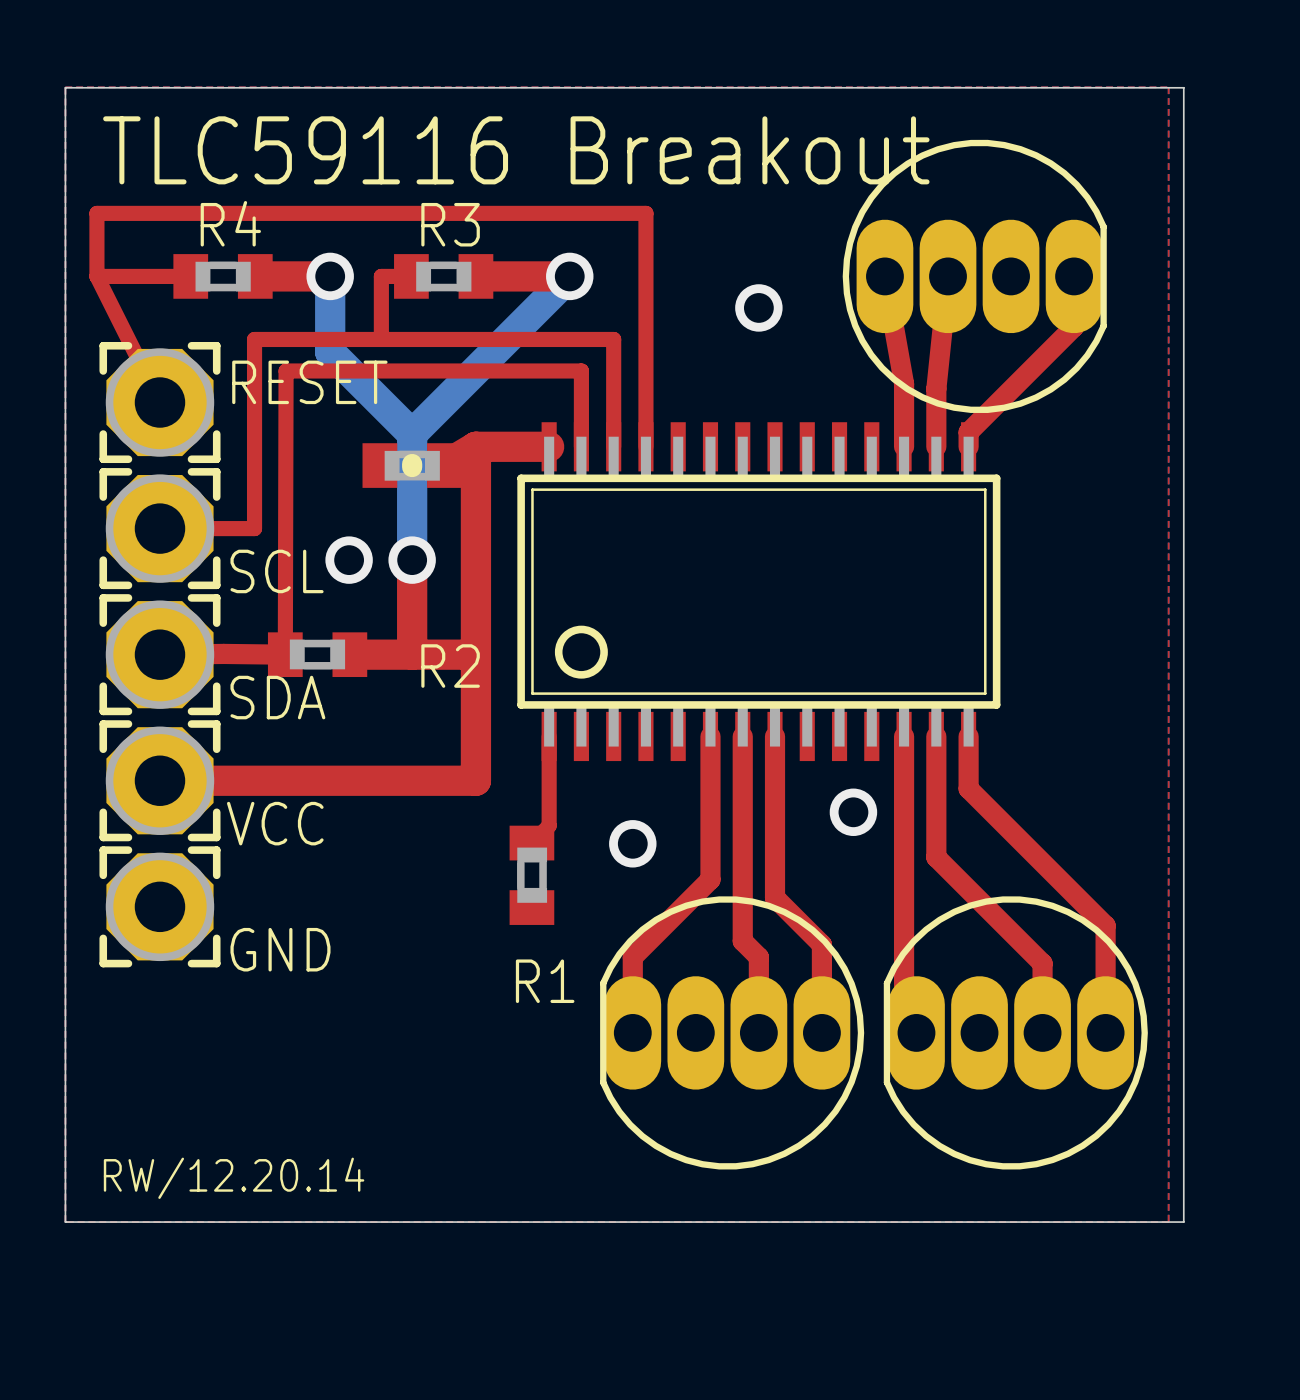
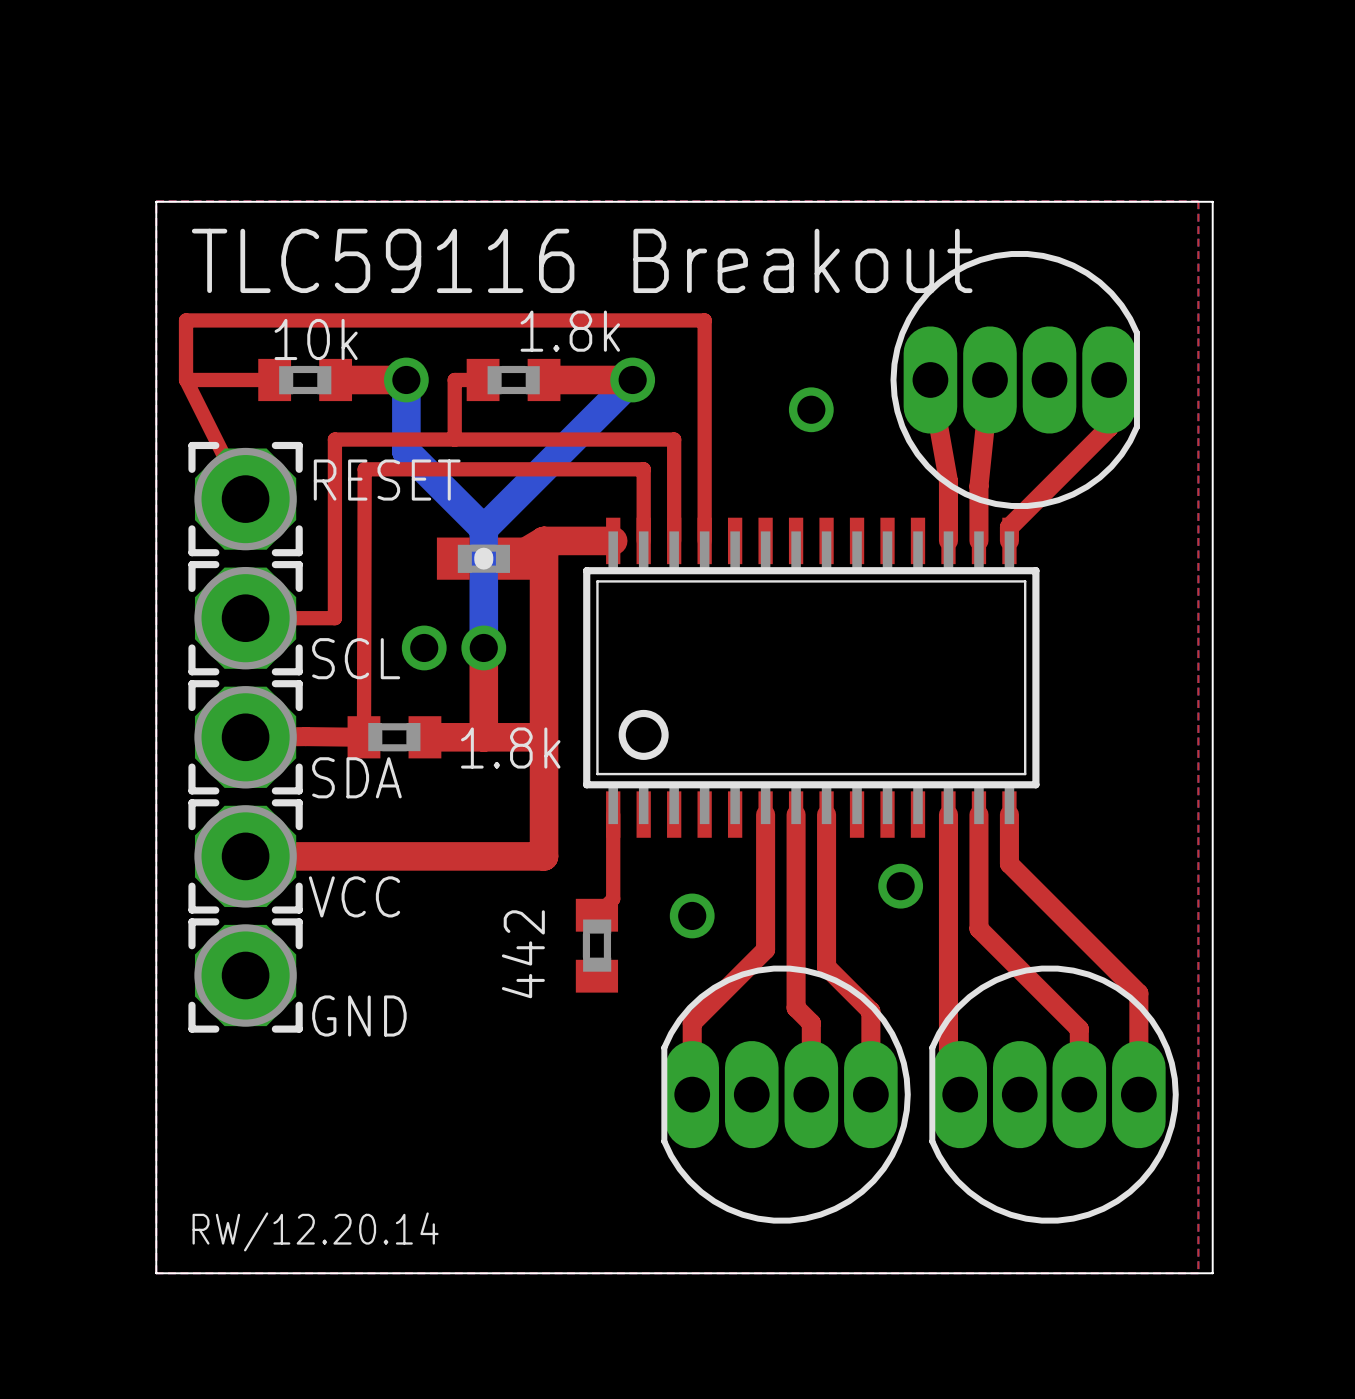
text: R4 (230, 223) -> none
text: R3 (450, 224) -> 1.8k (570, 331)
text: none -> 10k (316, 339)
text: R2 (450, 666) -> 1.8k (510, 748)
text: none -> 442 (523, 954)
text: R1 (545, 981) -> none

